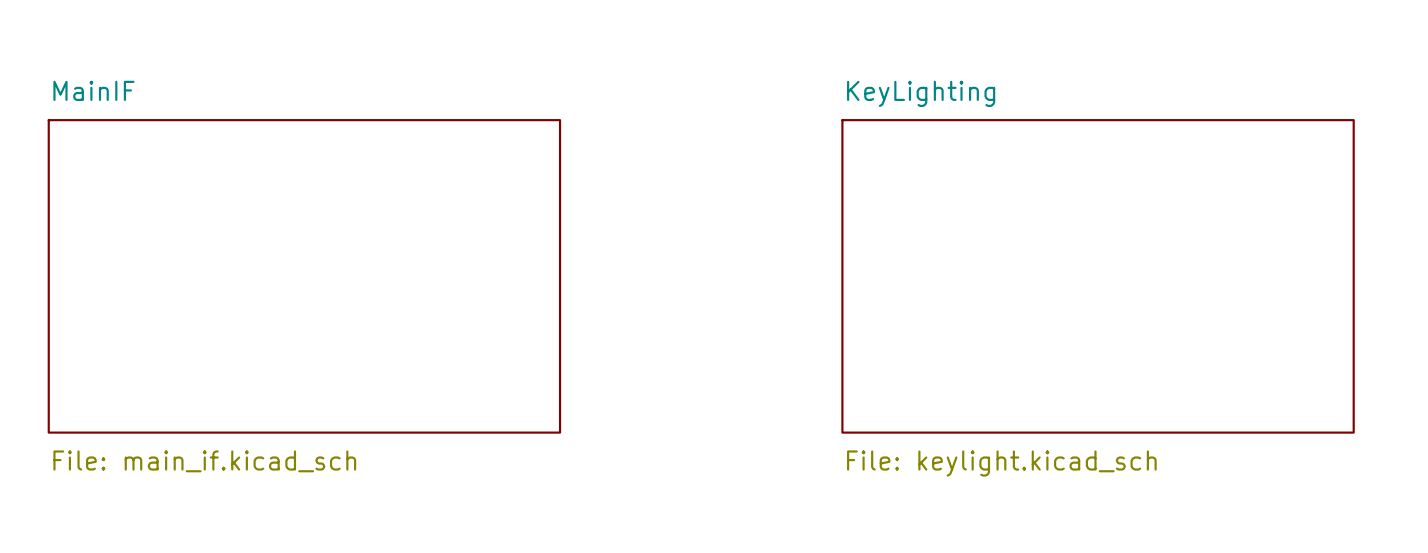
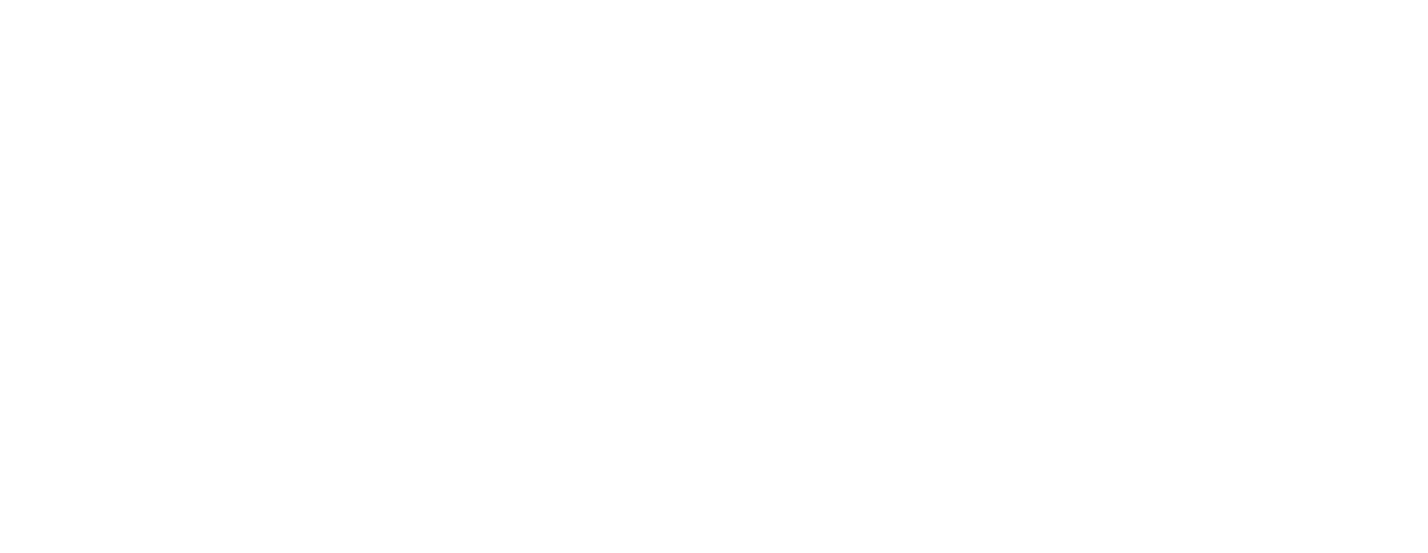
sheet MainIF: File: main_if.kicad_sch (304, 276) -> none
sheet KeyLighting: File: keylight.kicad_sch (1098, 276) -> none

